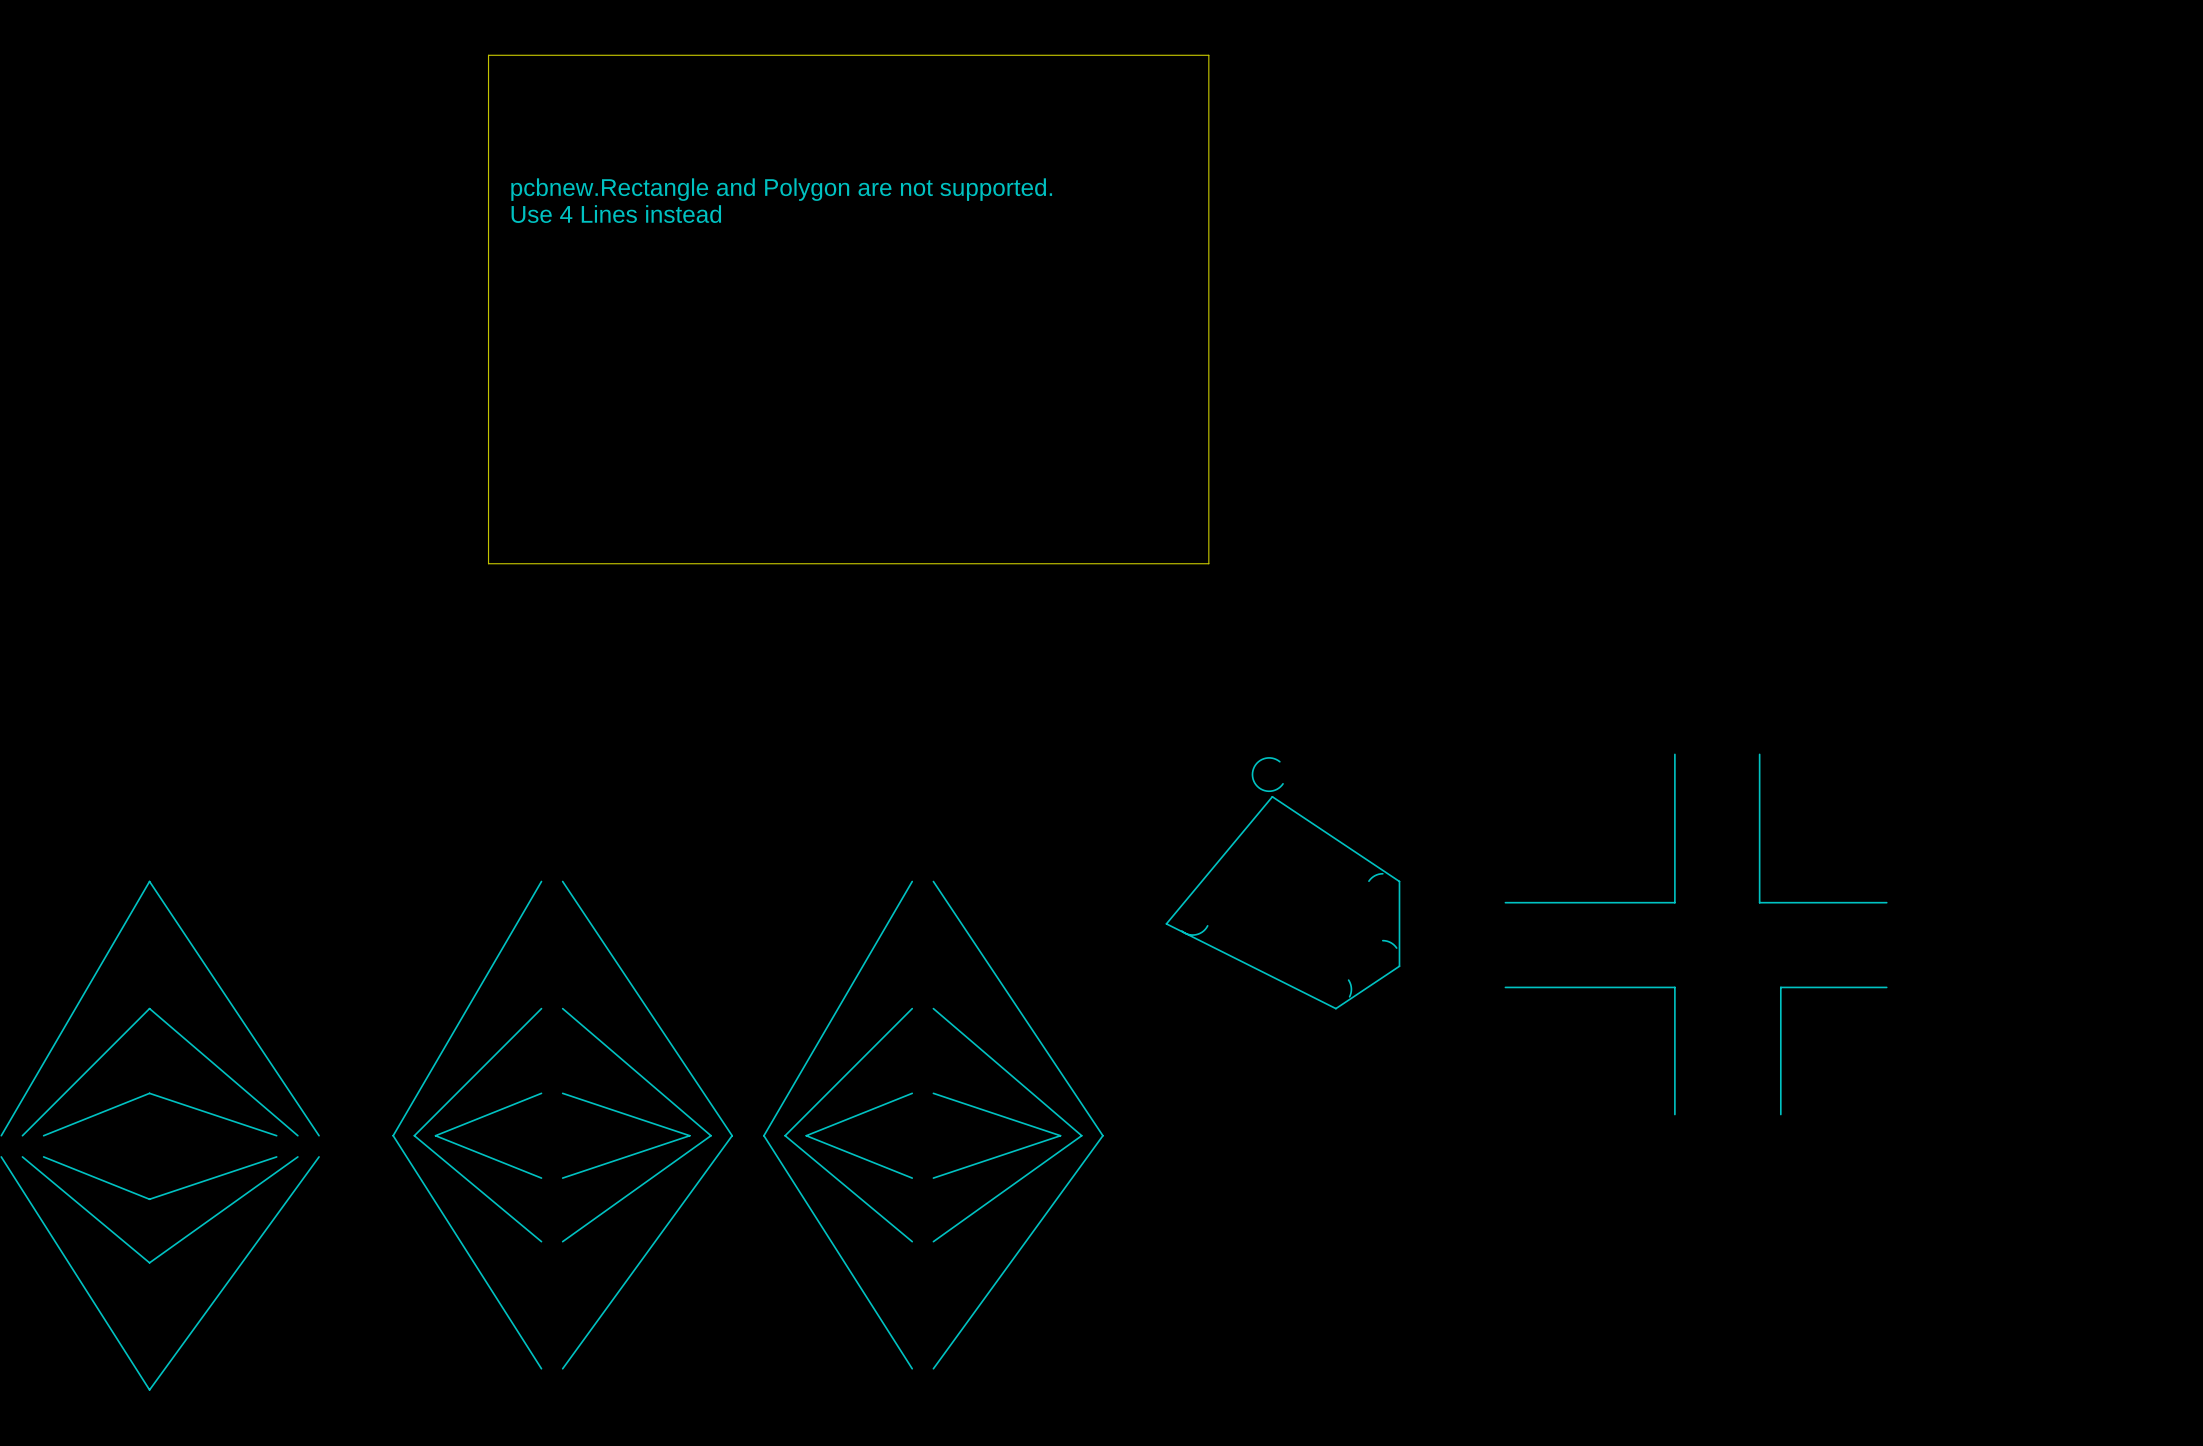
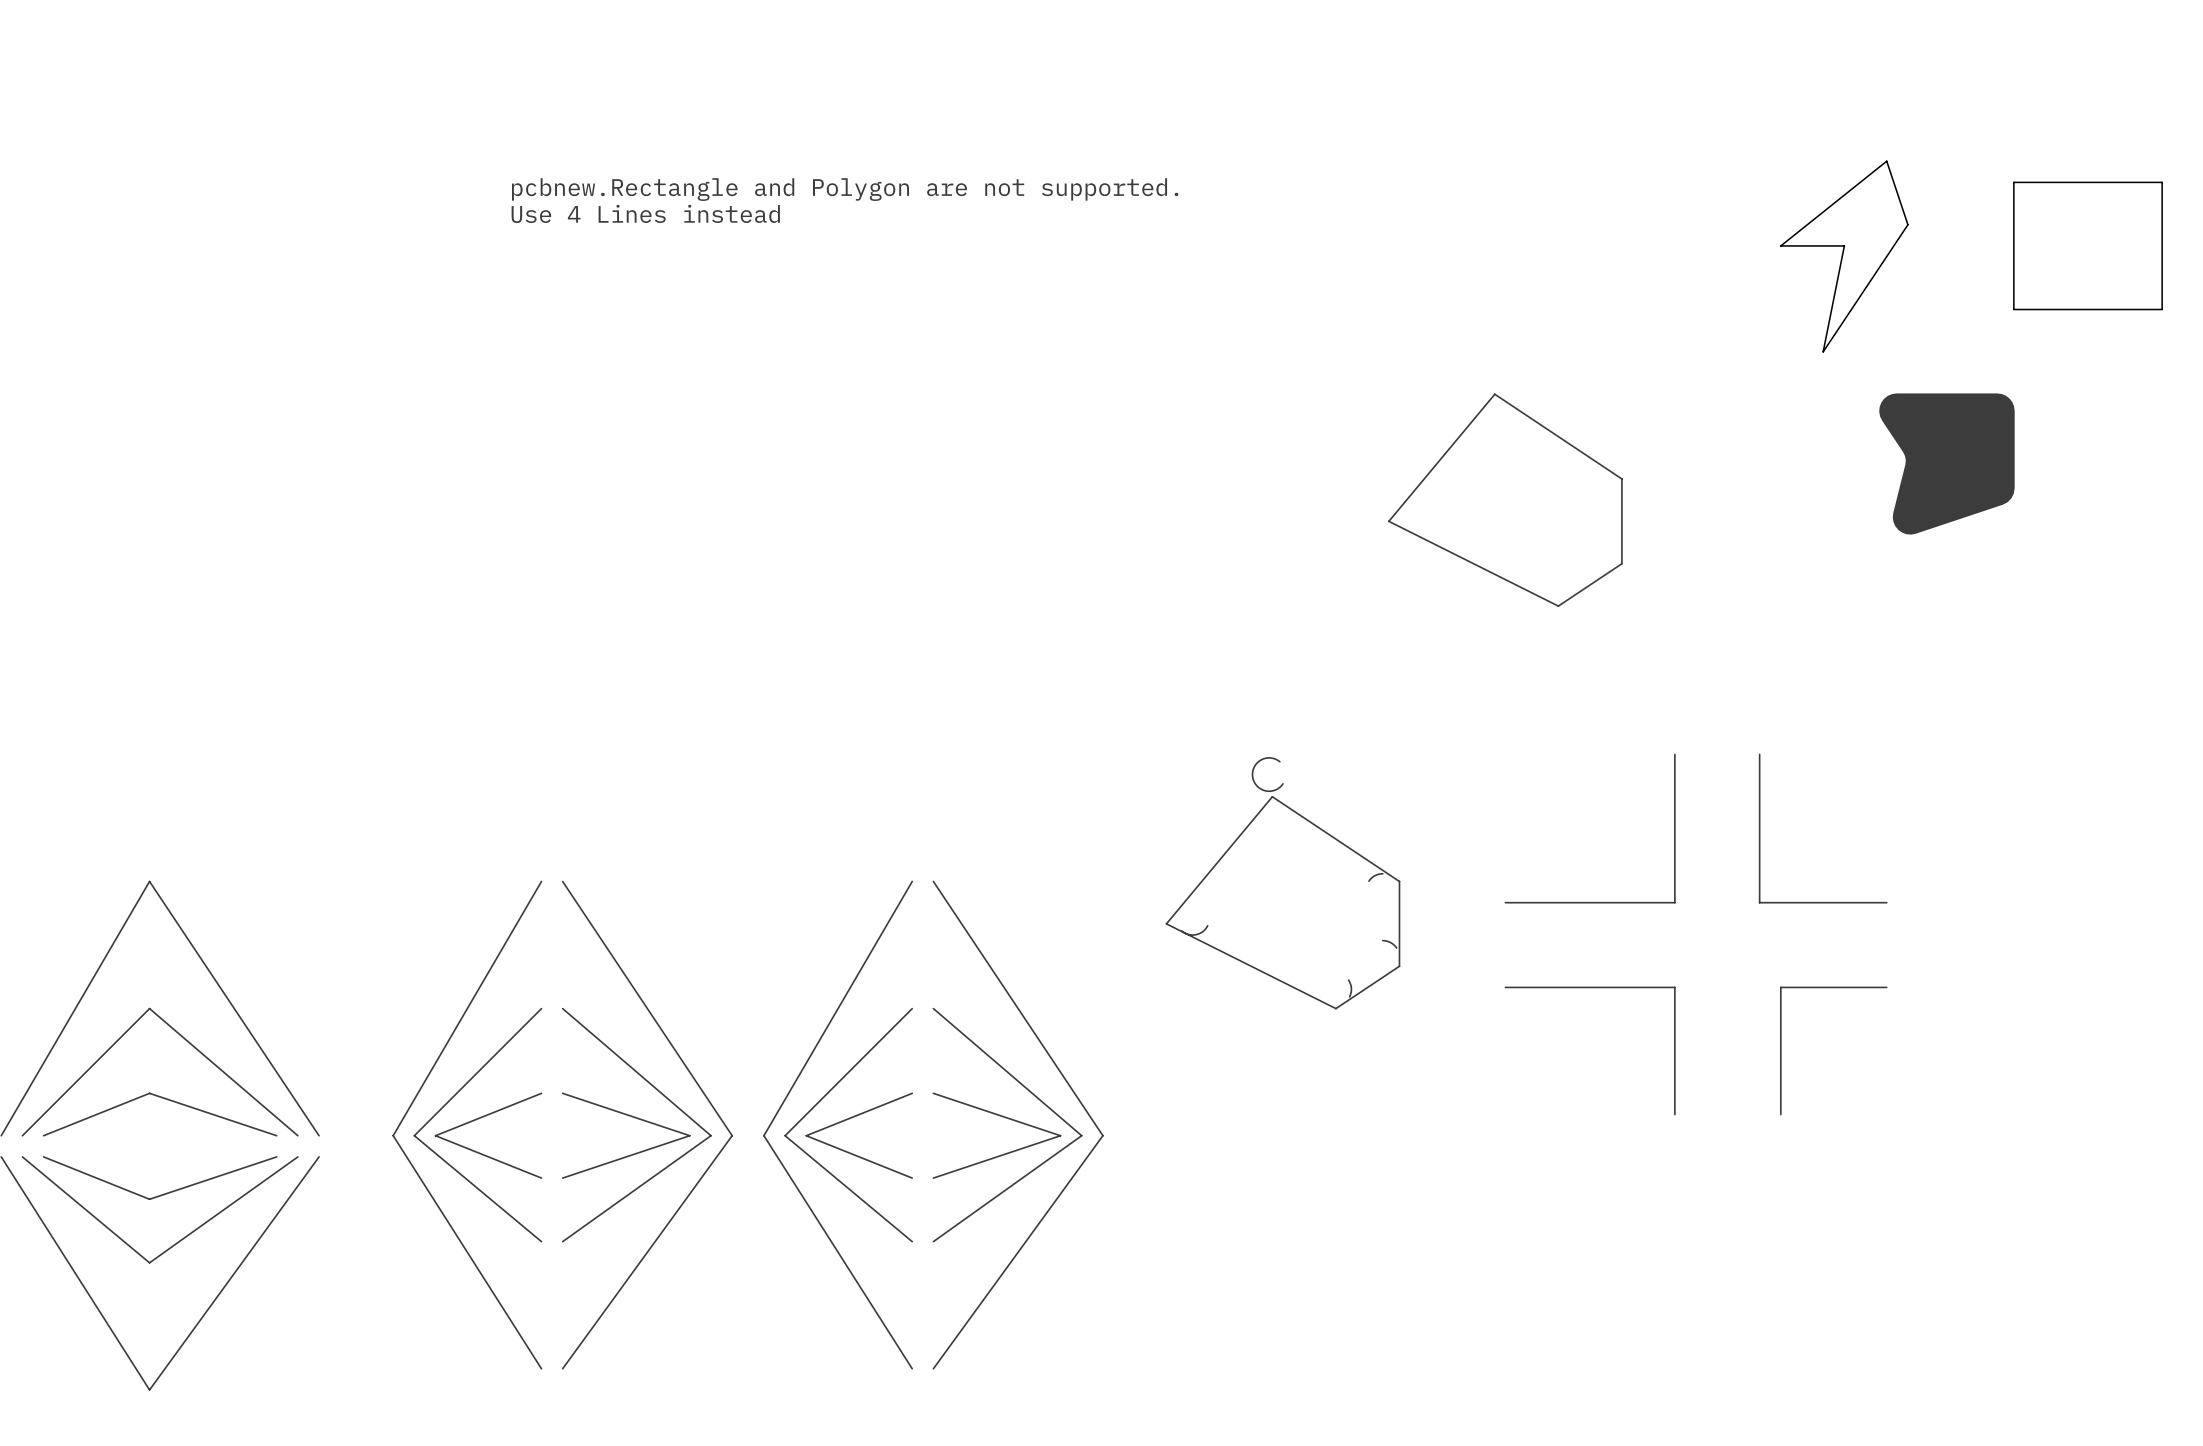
board edge: (488, 55) (1208, 55) (1208, 563) (488, 563) (488, 55) -> none
board edge: none -> (1886, 161) (1780, 245) (1844, 245) (1823, 351) (1907, 224) (1886, 161)
board edge: none -> (2013, 182) (2162, 182) (2162, 309) (2013, 309) (2013, 182)
drawing: none -> [1879, 393, 2015, 535]
line: none -> (1494, 394) (1621, 478) (1621, 563) (1558, 606) (1388, 521) (1494, 394)

